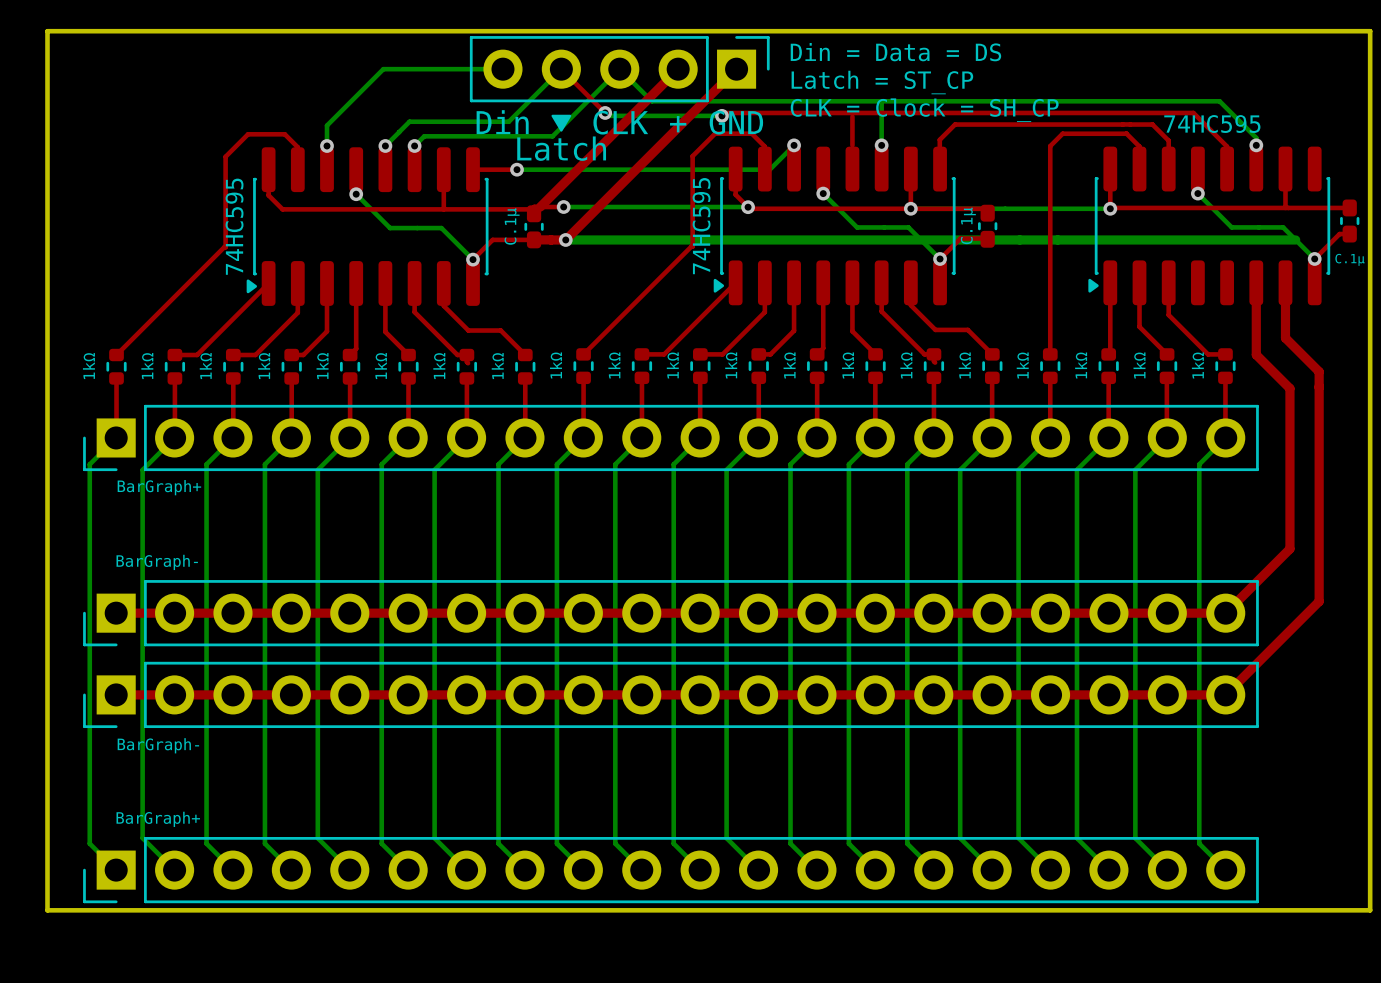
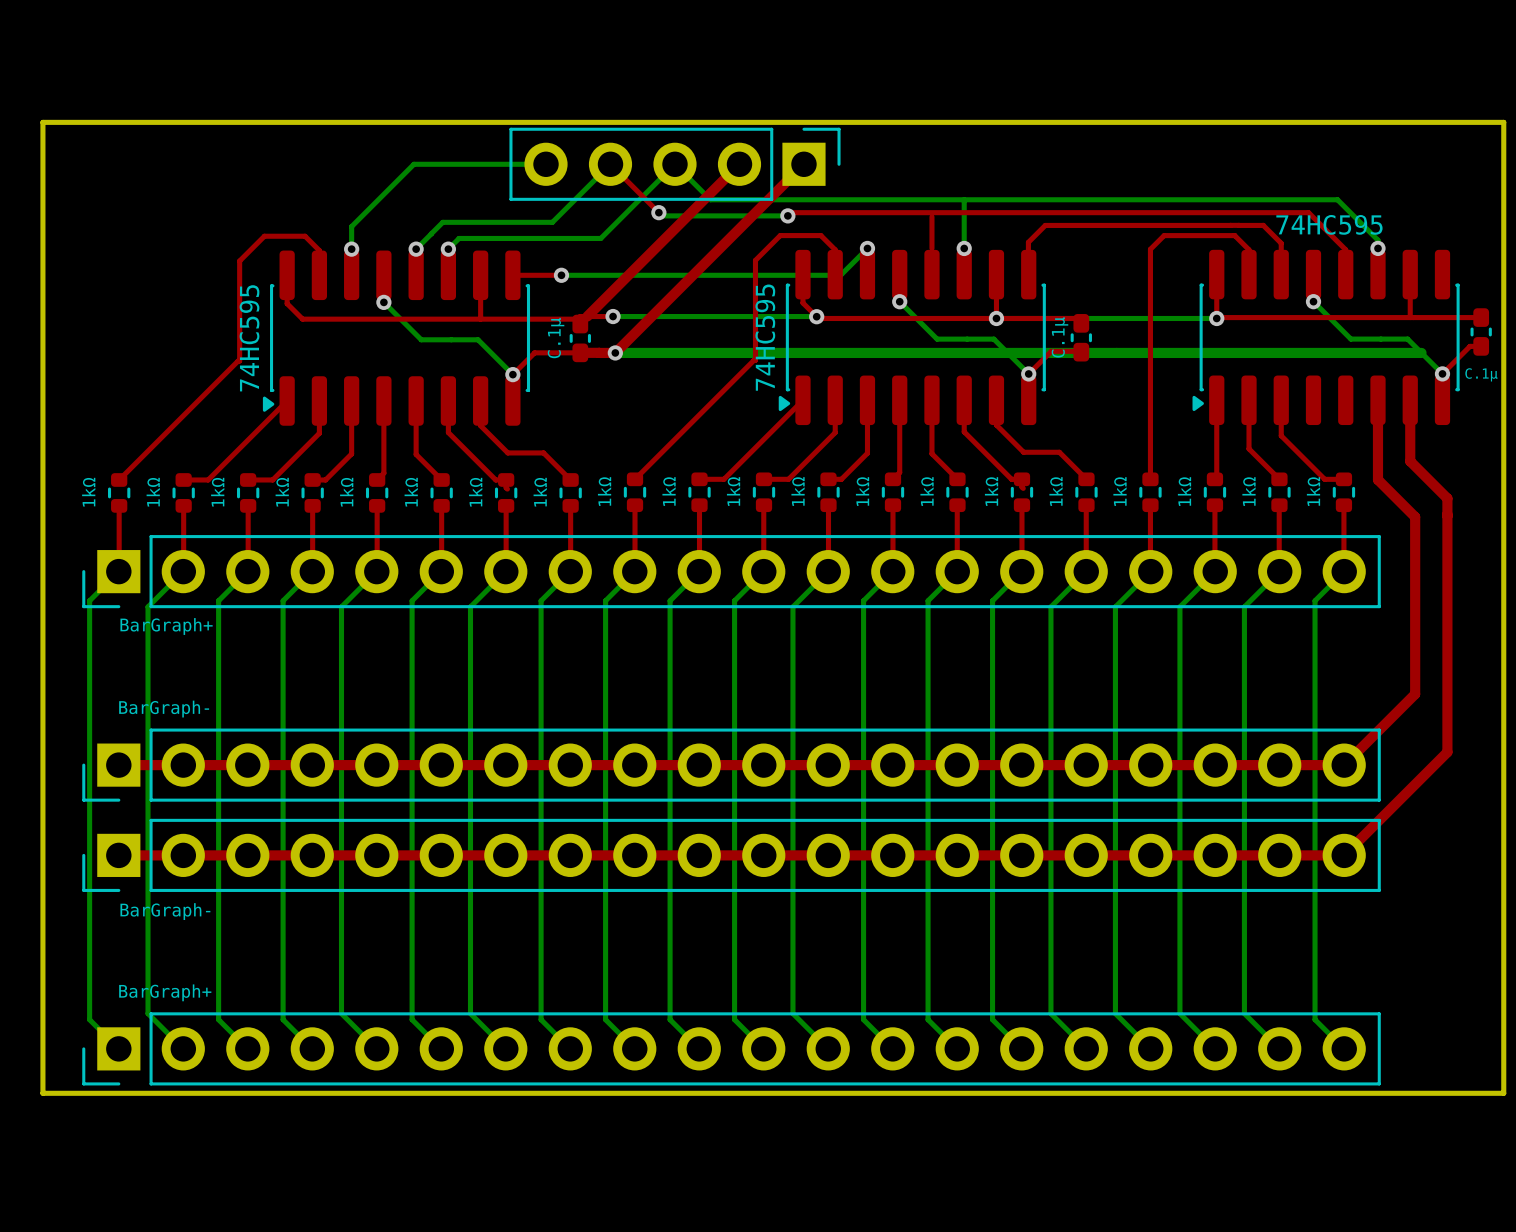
text: Din = Data = DS (895, 52) -> none
text: Latch = ST_CP (882, 82) -> none
text: CLK = Clock = SH_CP (924, 110) -> none
drawing: [551, 114, 572, 132] -> none
text: Din (502, 122) -> none
text: CLK (620, 122) -> none
text: GND (736, 122) -> none
text: + (678, 124) -> none
text: Latch (561, 148) -> none

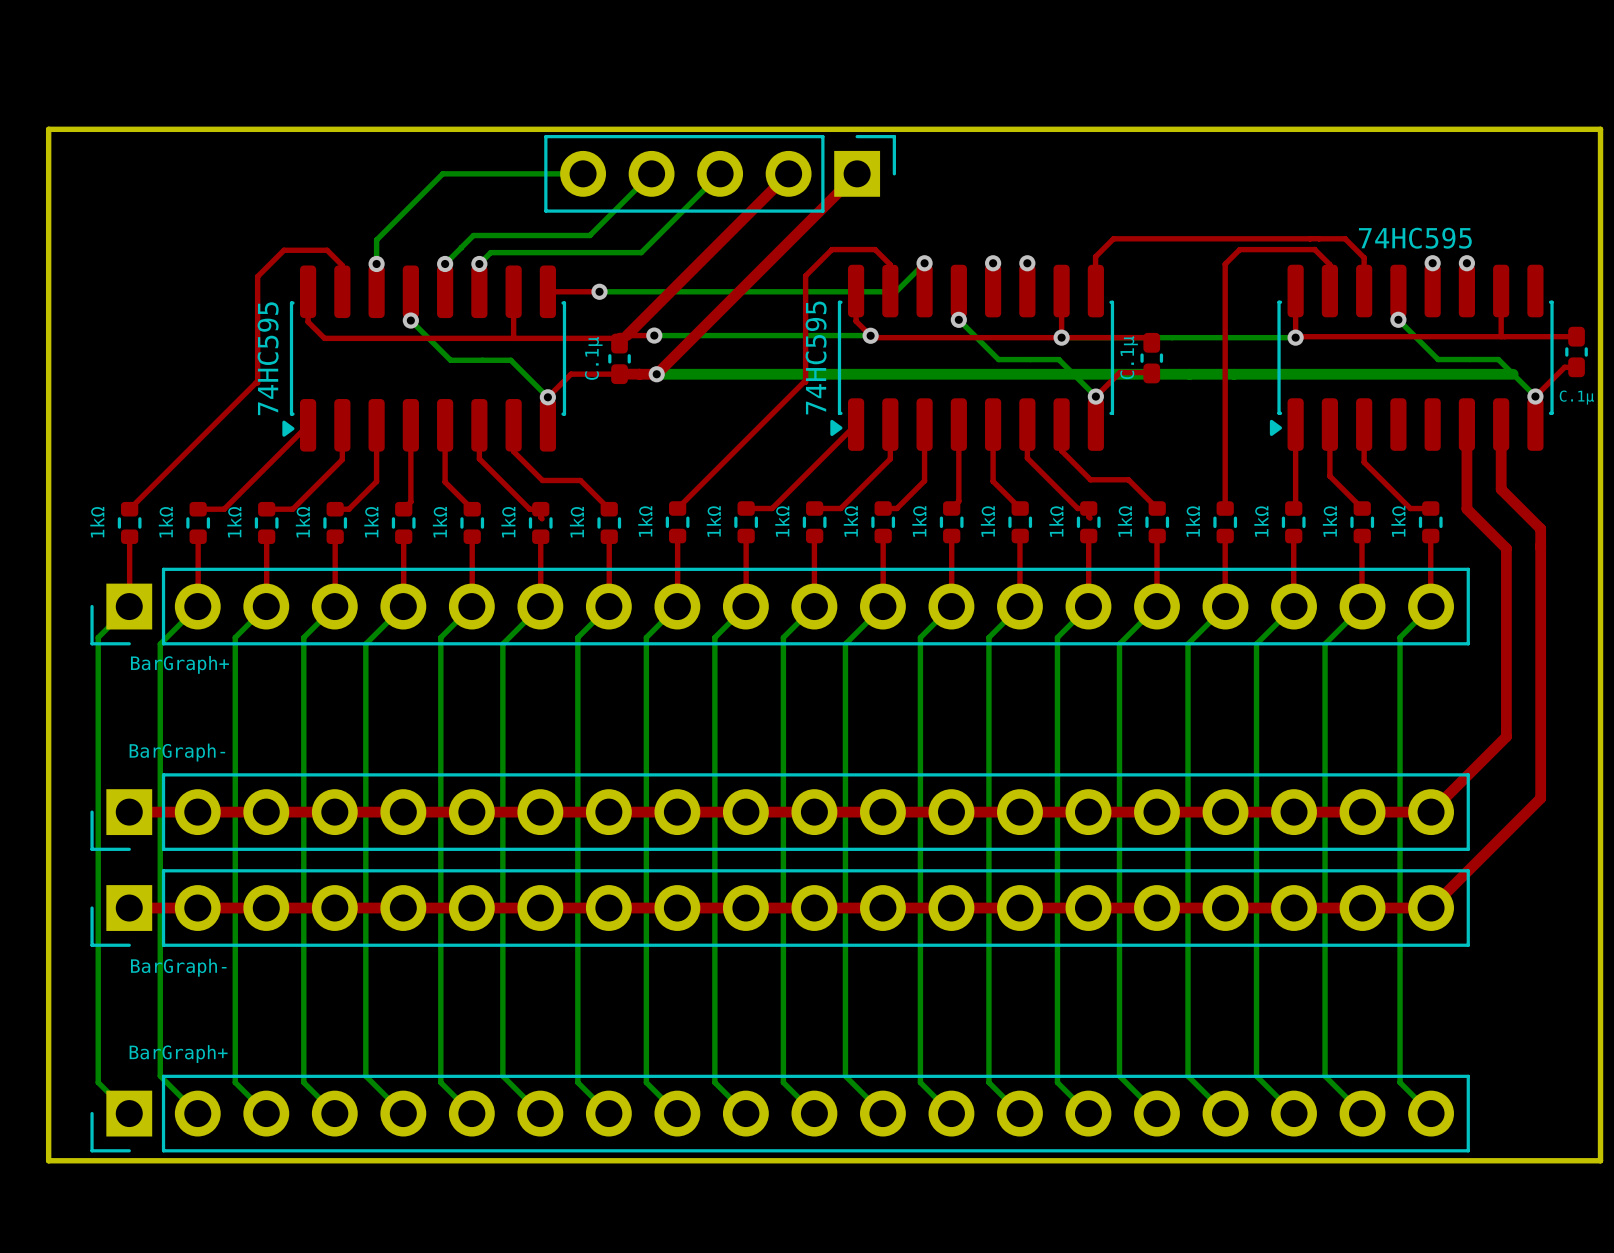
top track: (610, 164) (658, 212) -> none
bottom track: (674, 164) (710, 199) (1337, 199) (1377, 240) (1377, 248) -> none
bottom track: (964, 199) (964, 248) -> none
bottom track: (658, 212) (662, 215) (787, 215) -> none
via: (658, 212) -> none
top track: (787, 215) (791, 212) (1308, 212) (1345, 249) (1345, 274) -> none
via: (787, 215) -> none
top track: (931, 216) (931, 248) -> none
via: none -> (993, 263)
via: none -> (1432, 263)

